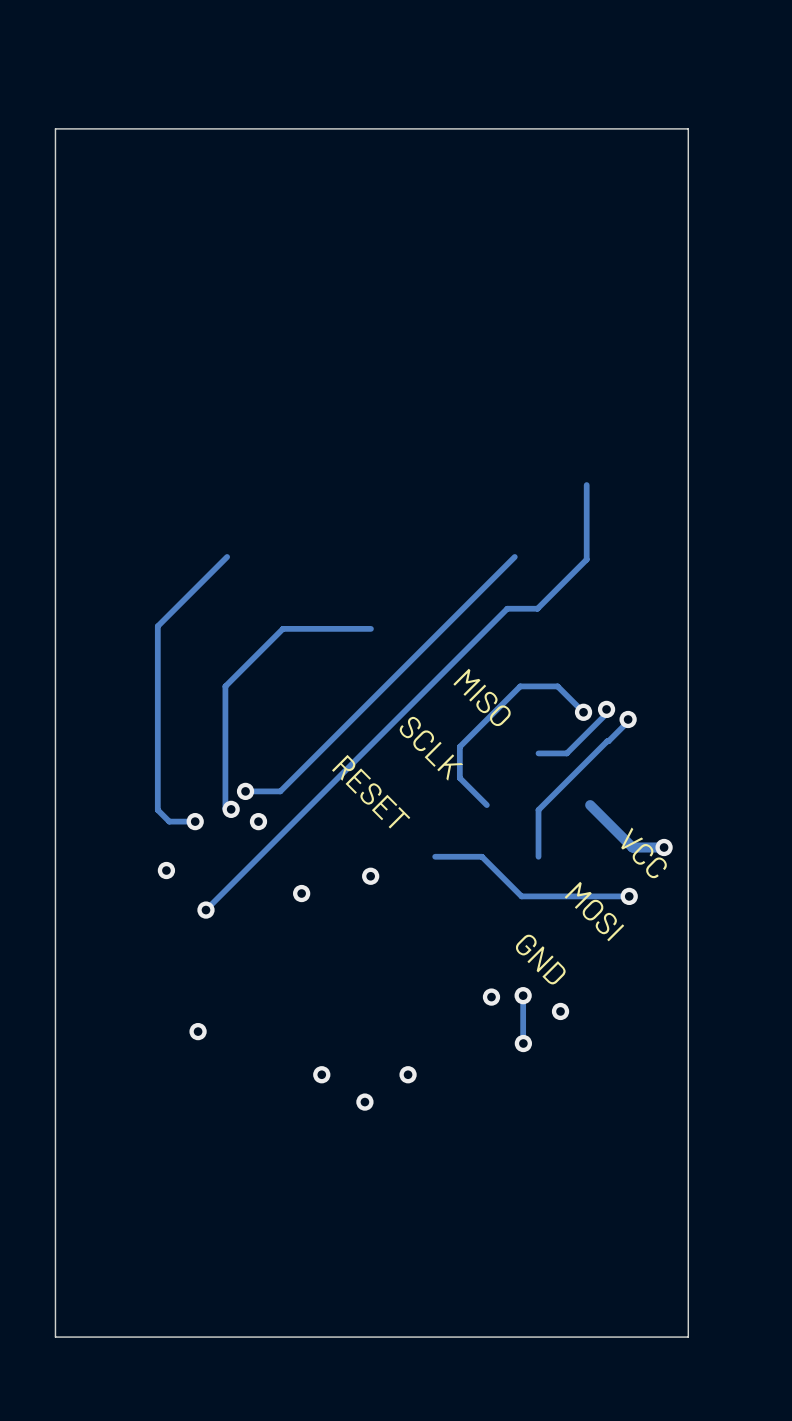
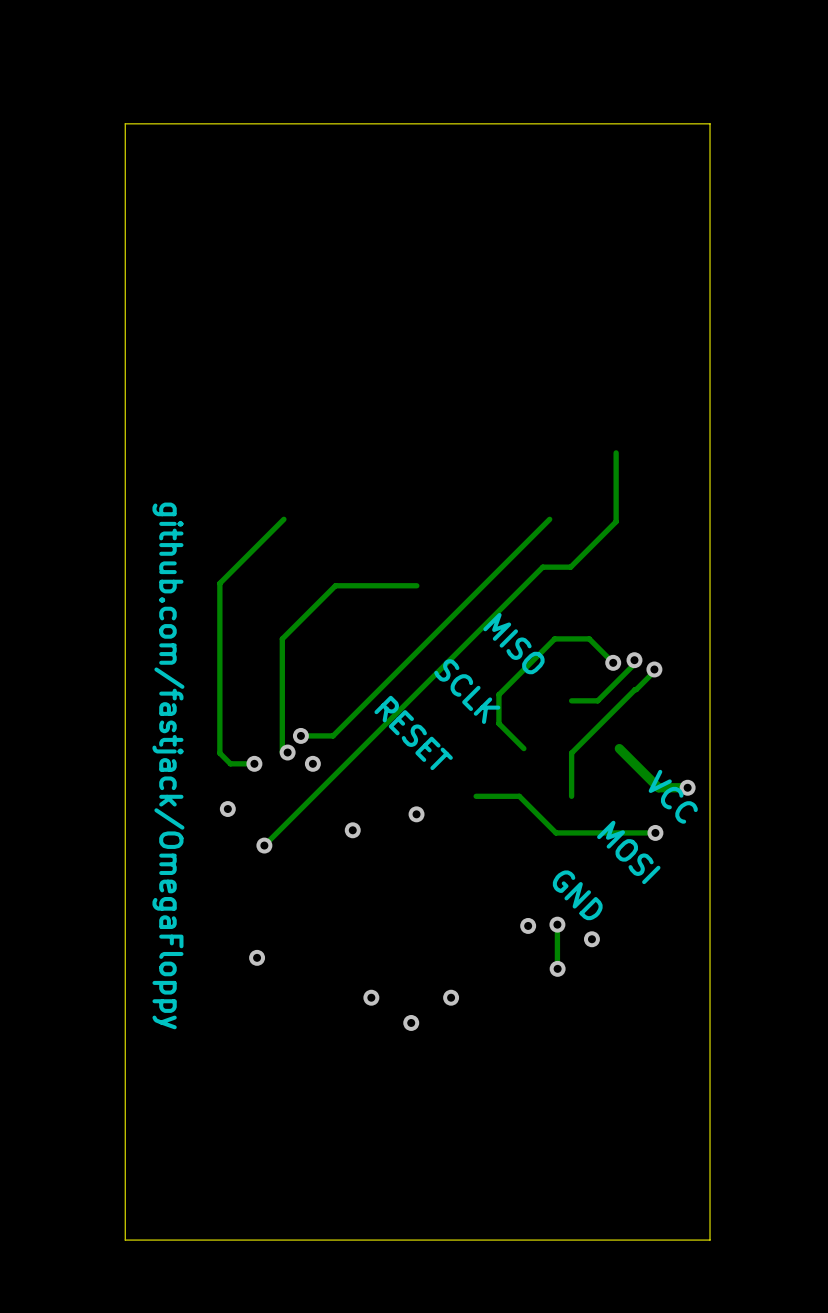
text: none -> github.com/fastjack/OmegaFloppy (168, 765)

